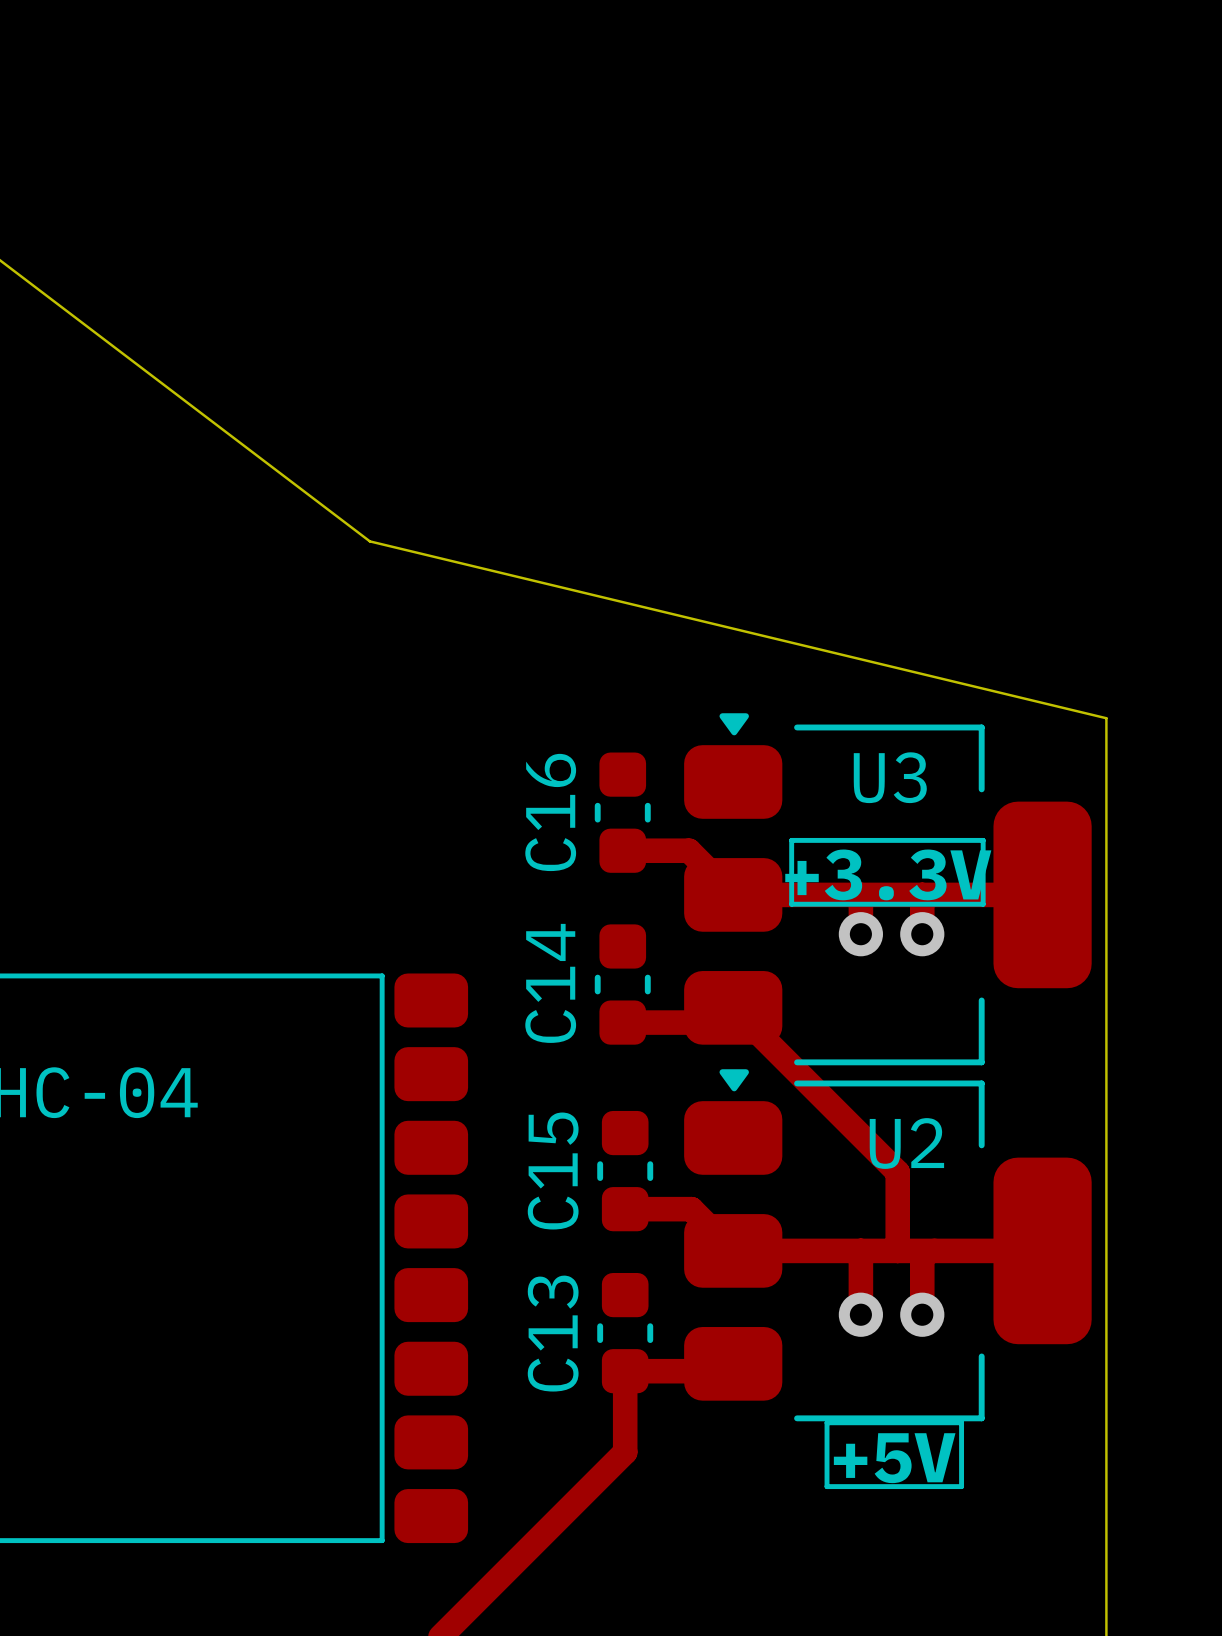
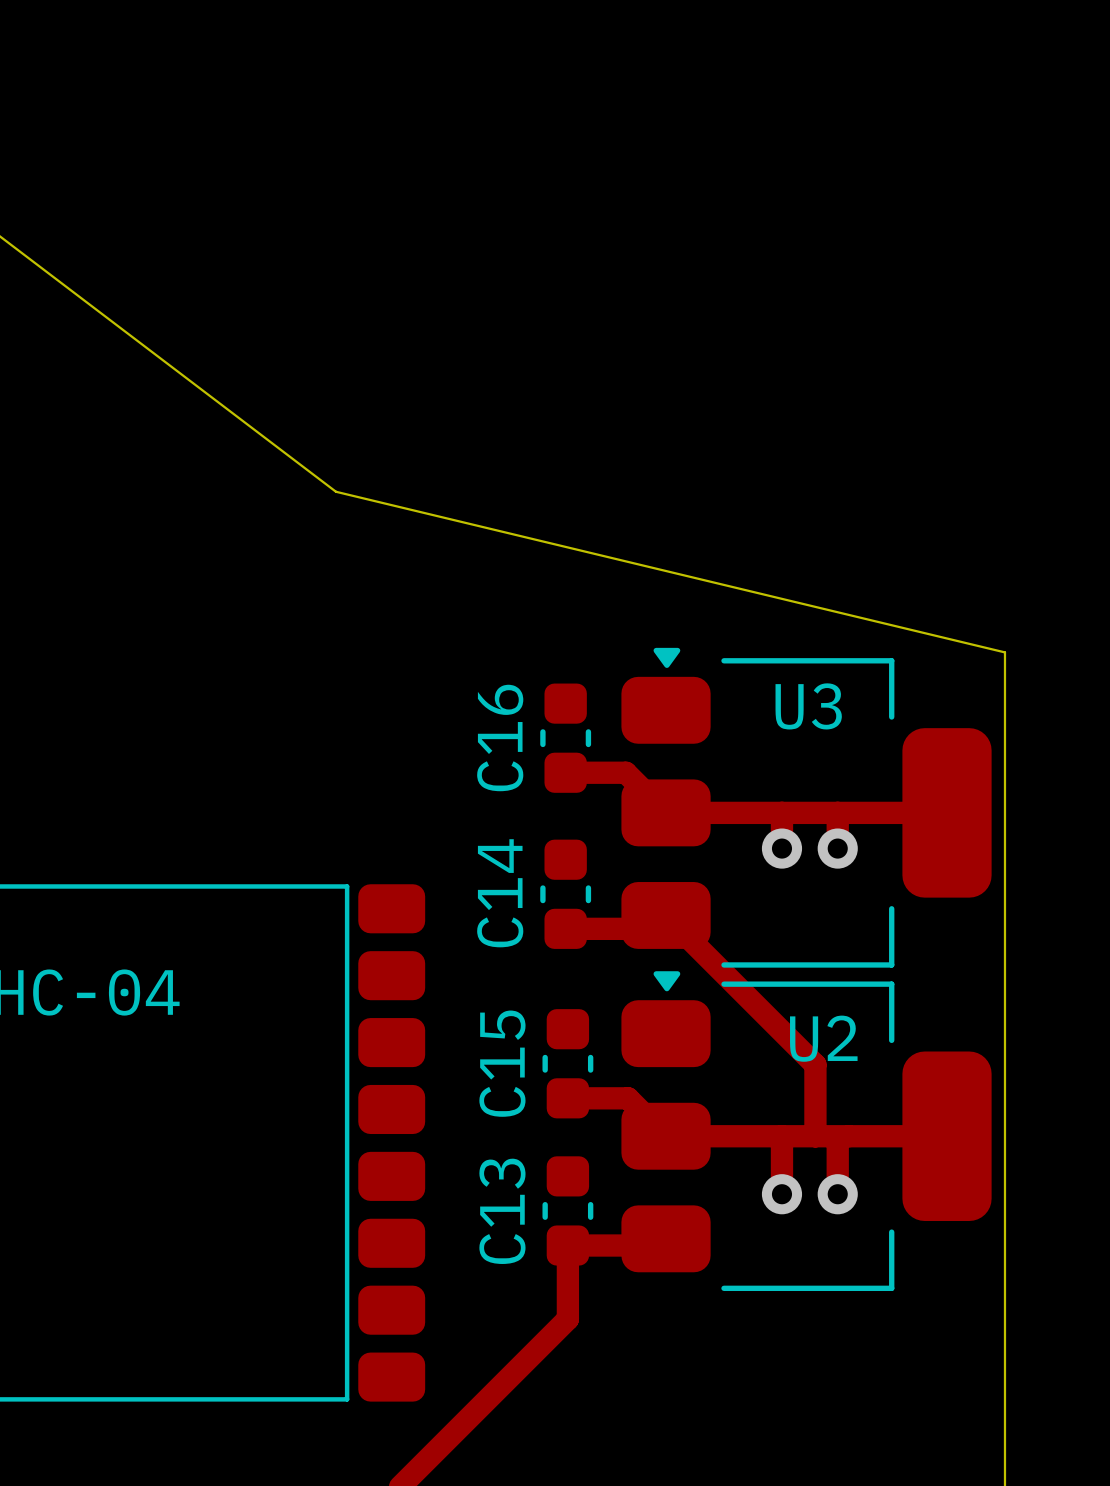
line: (791, 840) (983, 840) (983, 904) (791, 904) (791, 840) -> none
text: +3.3V (888, 874) -> none
line: (827, 1422) (961, 1422) (961, 1486) (827, 1486) (827, 1422) -> none
text: +5V (894, 1458) -> none

